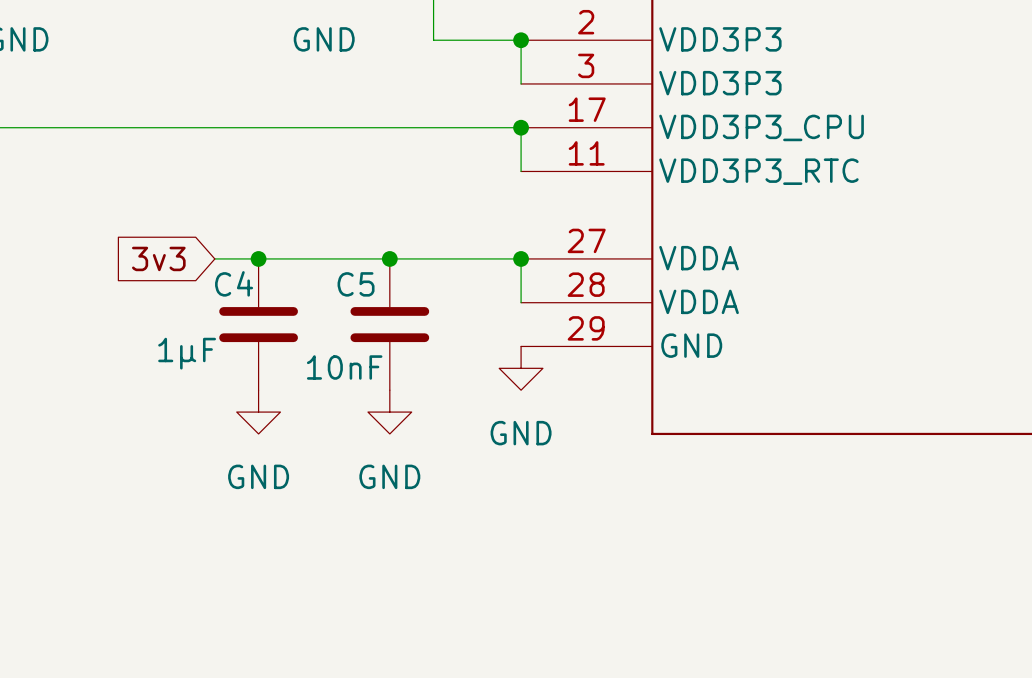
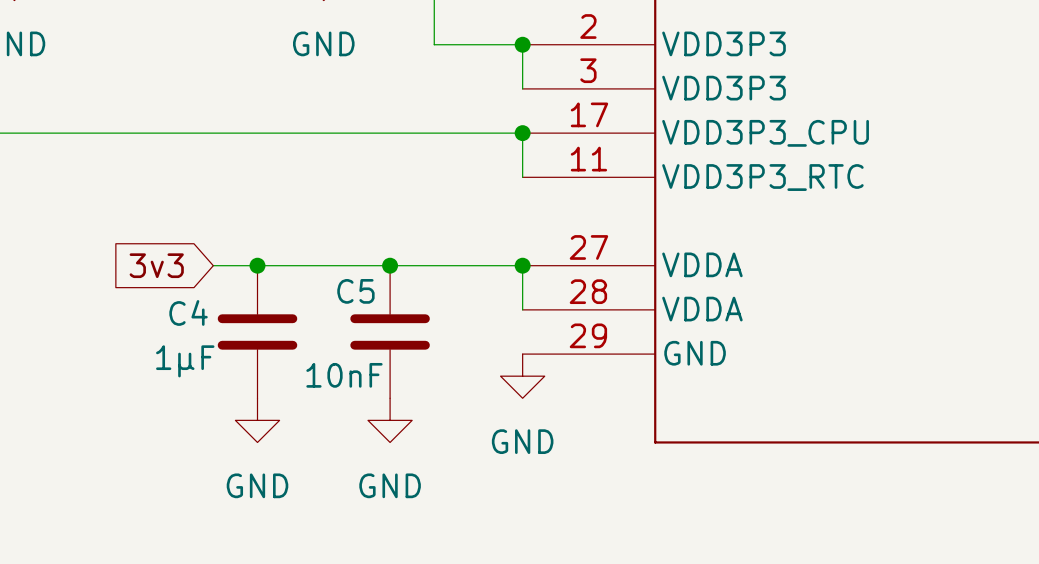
C4 name position: C4 (234, 283) -> C4 (188, 312)

